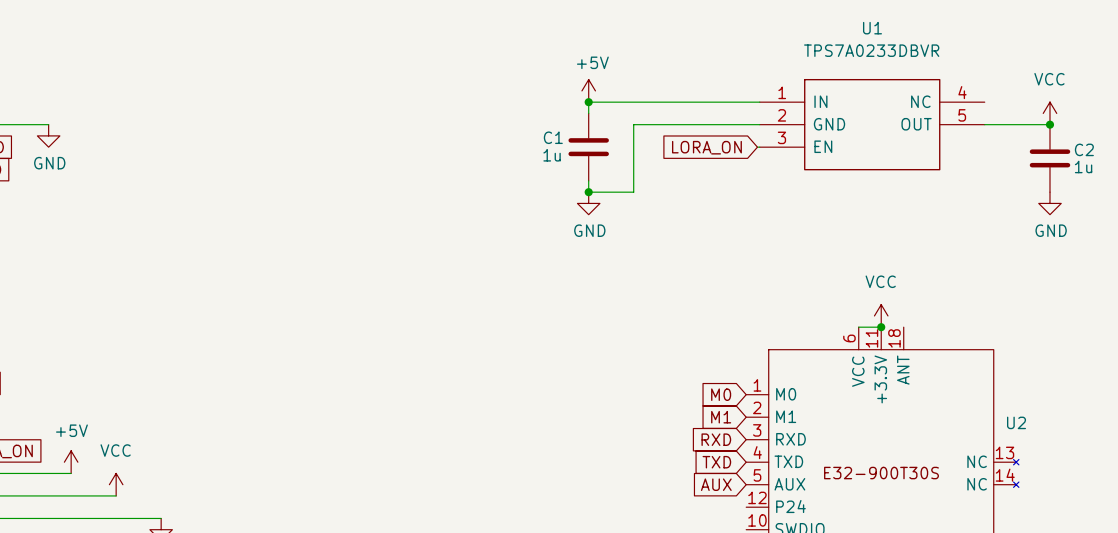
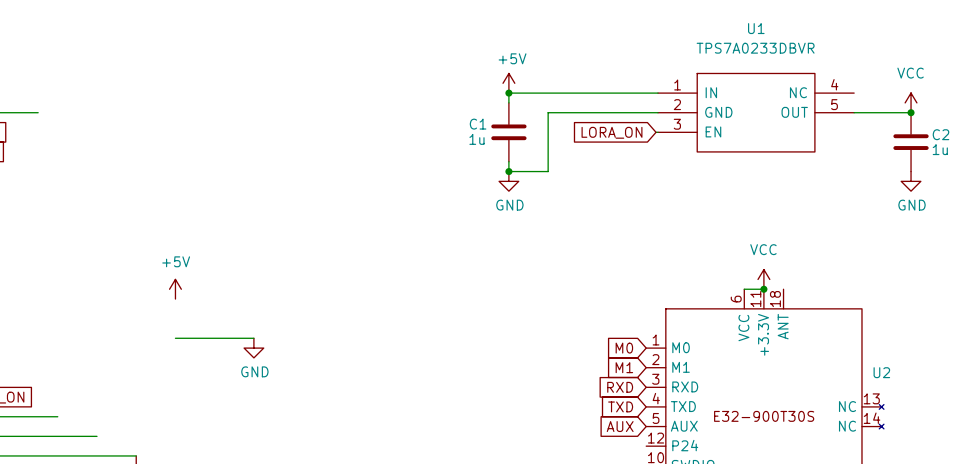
power symbol: GND (48, 135) -> none
power symbol: none -> +5V (175, 289)
wire: none -> (175, 338) (253, 338)
power symbol: none -> GND (253, 348)
power symbol: +5V (71, 462) -> none
power symbol: VCC (116, 484) -> none

